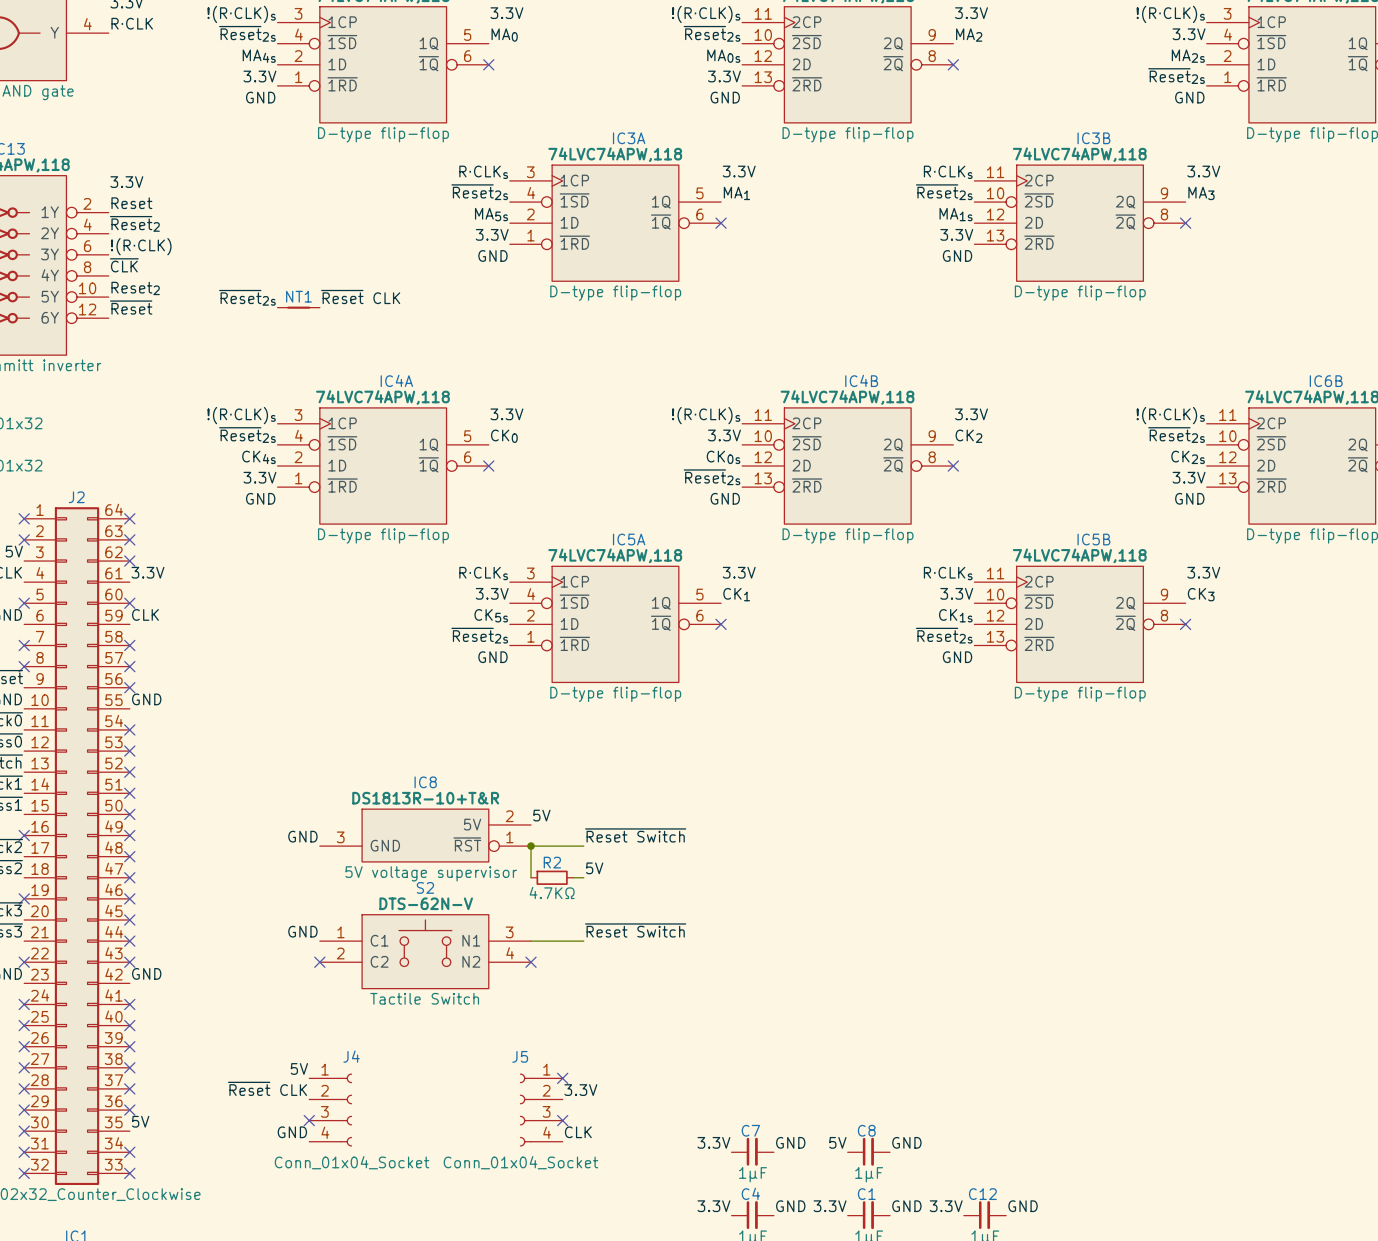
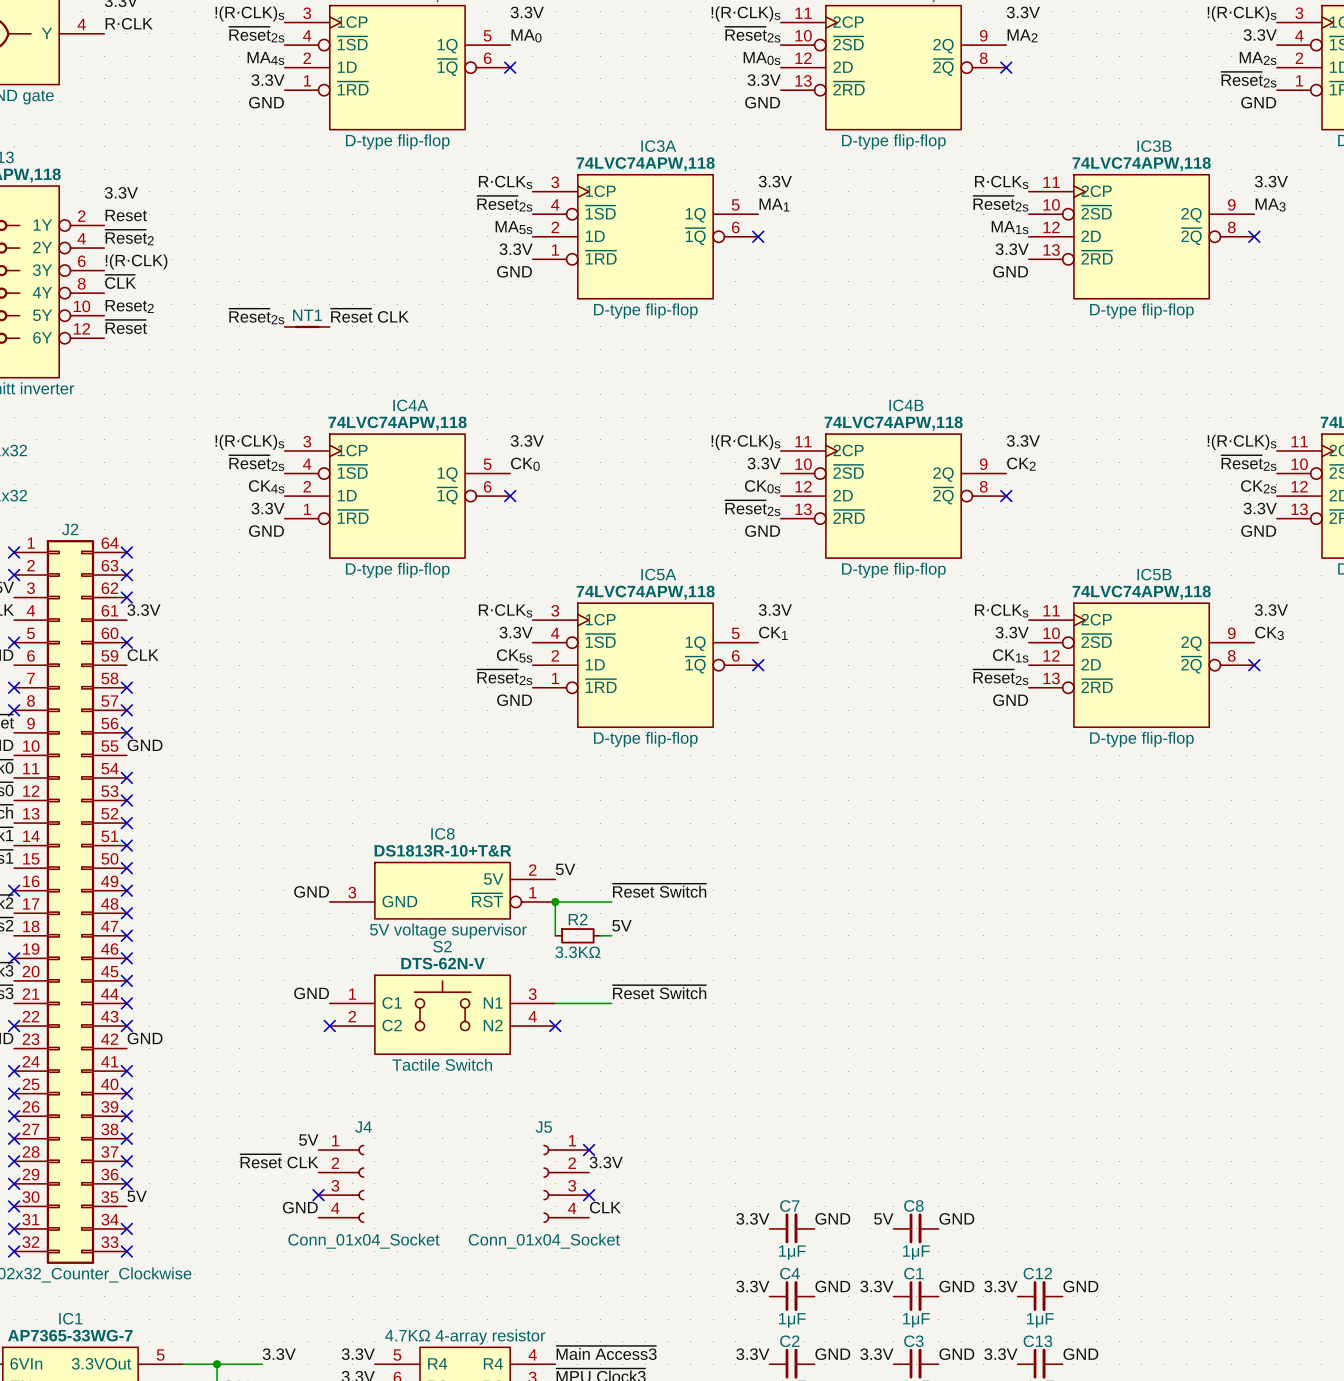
R2 value: 4.7KΩ (552, 892) -> 3.3KΩ (577, 952)

